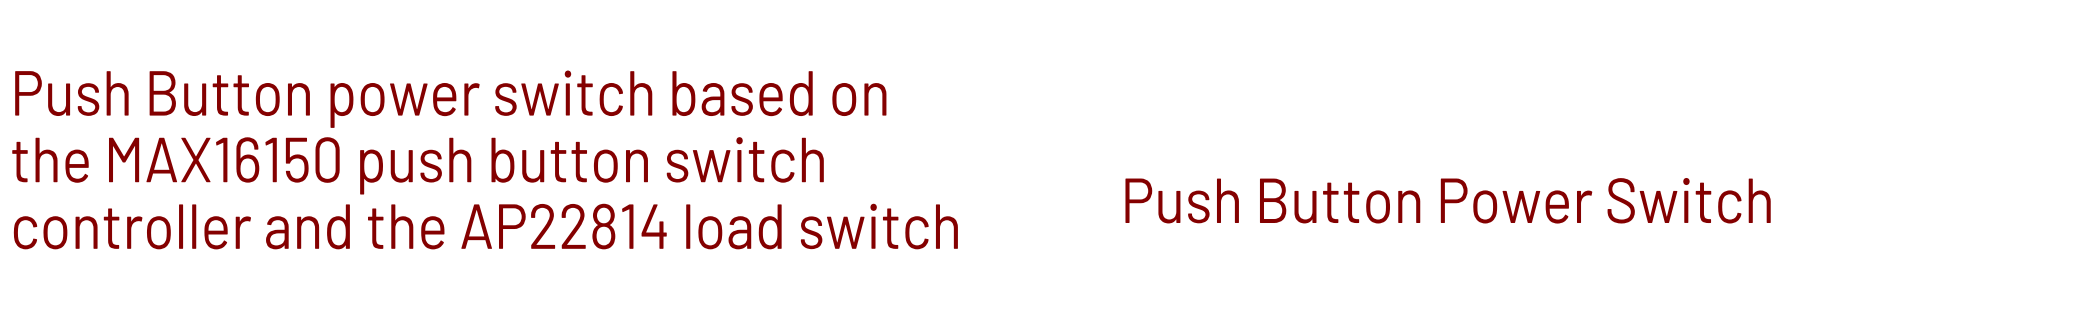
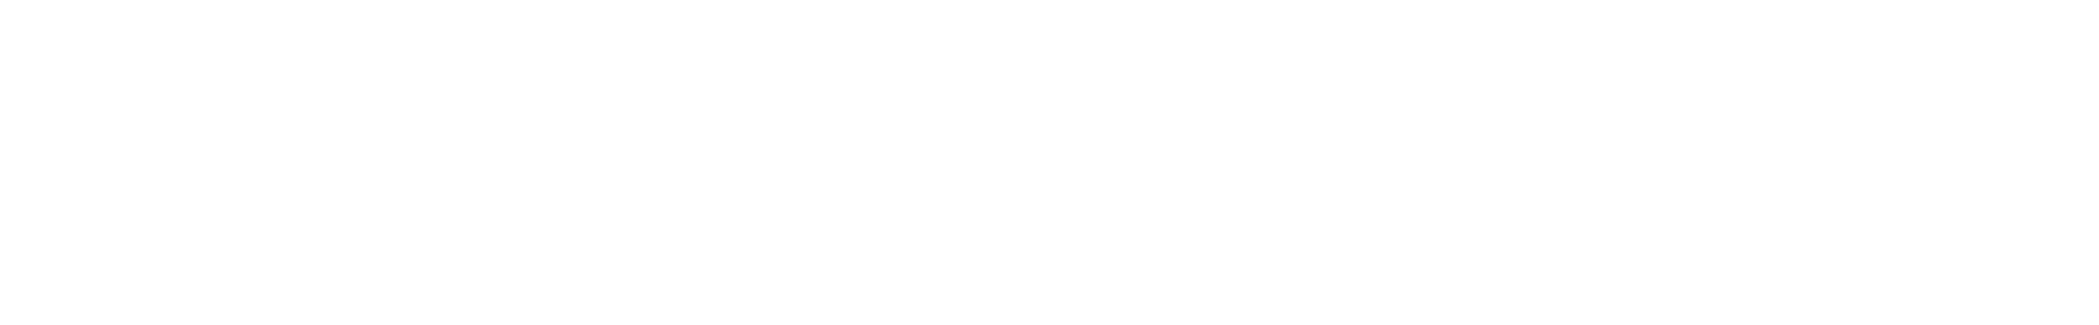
text: Push Button power switch based on (450, 99) -> none
text: the MAX16150 push button switch (418, 165) -> none
text: Push Button Power Switch (1448, 200) -> none
text: controller and the AP22814 load switch (485, 226) -> none

